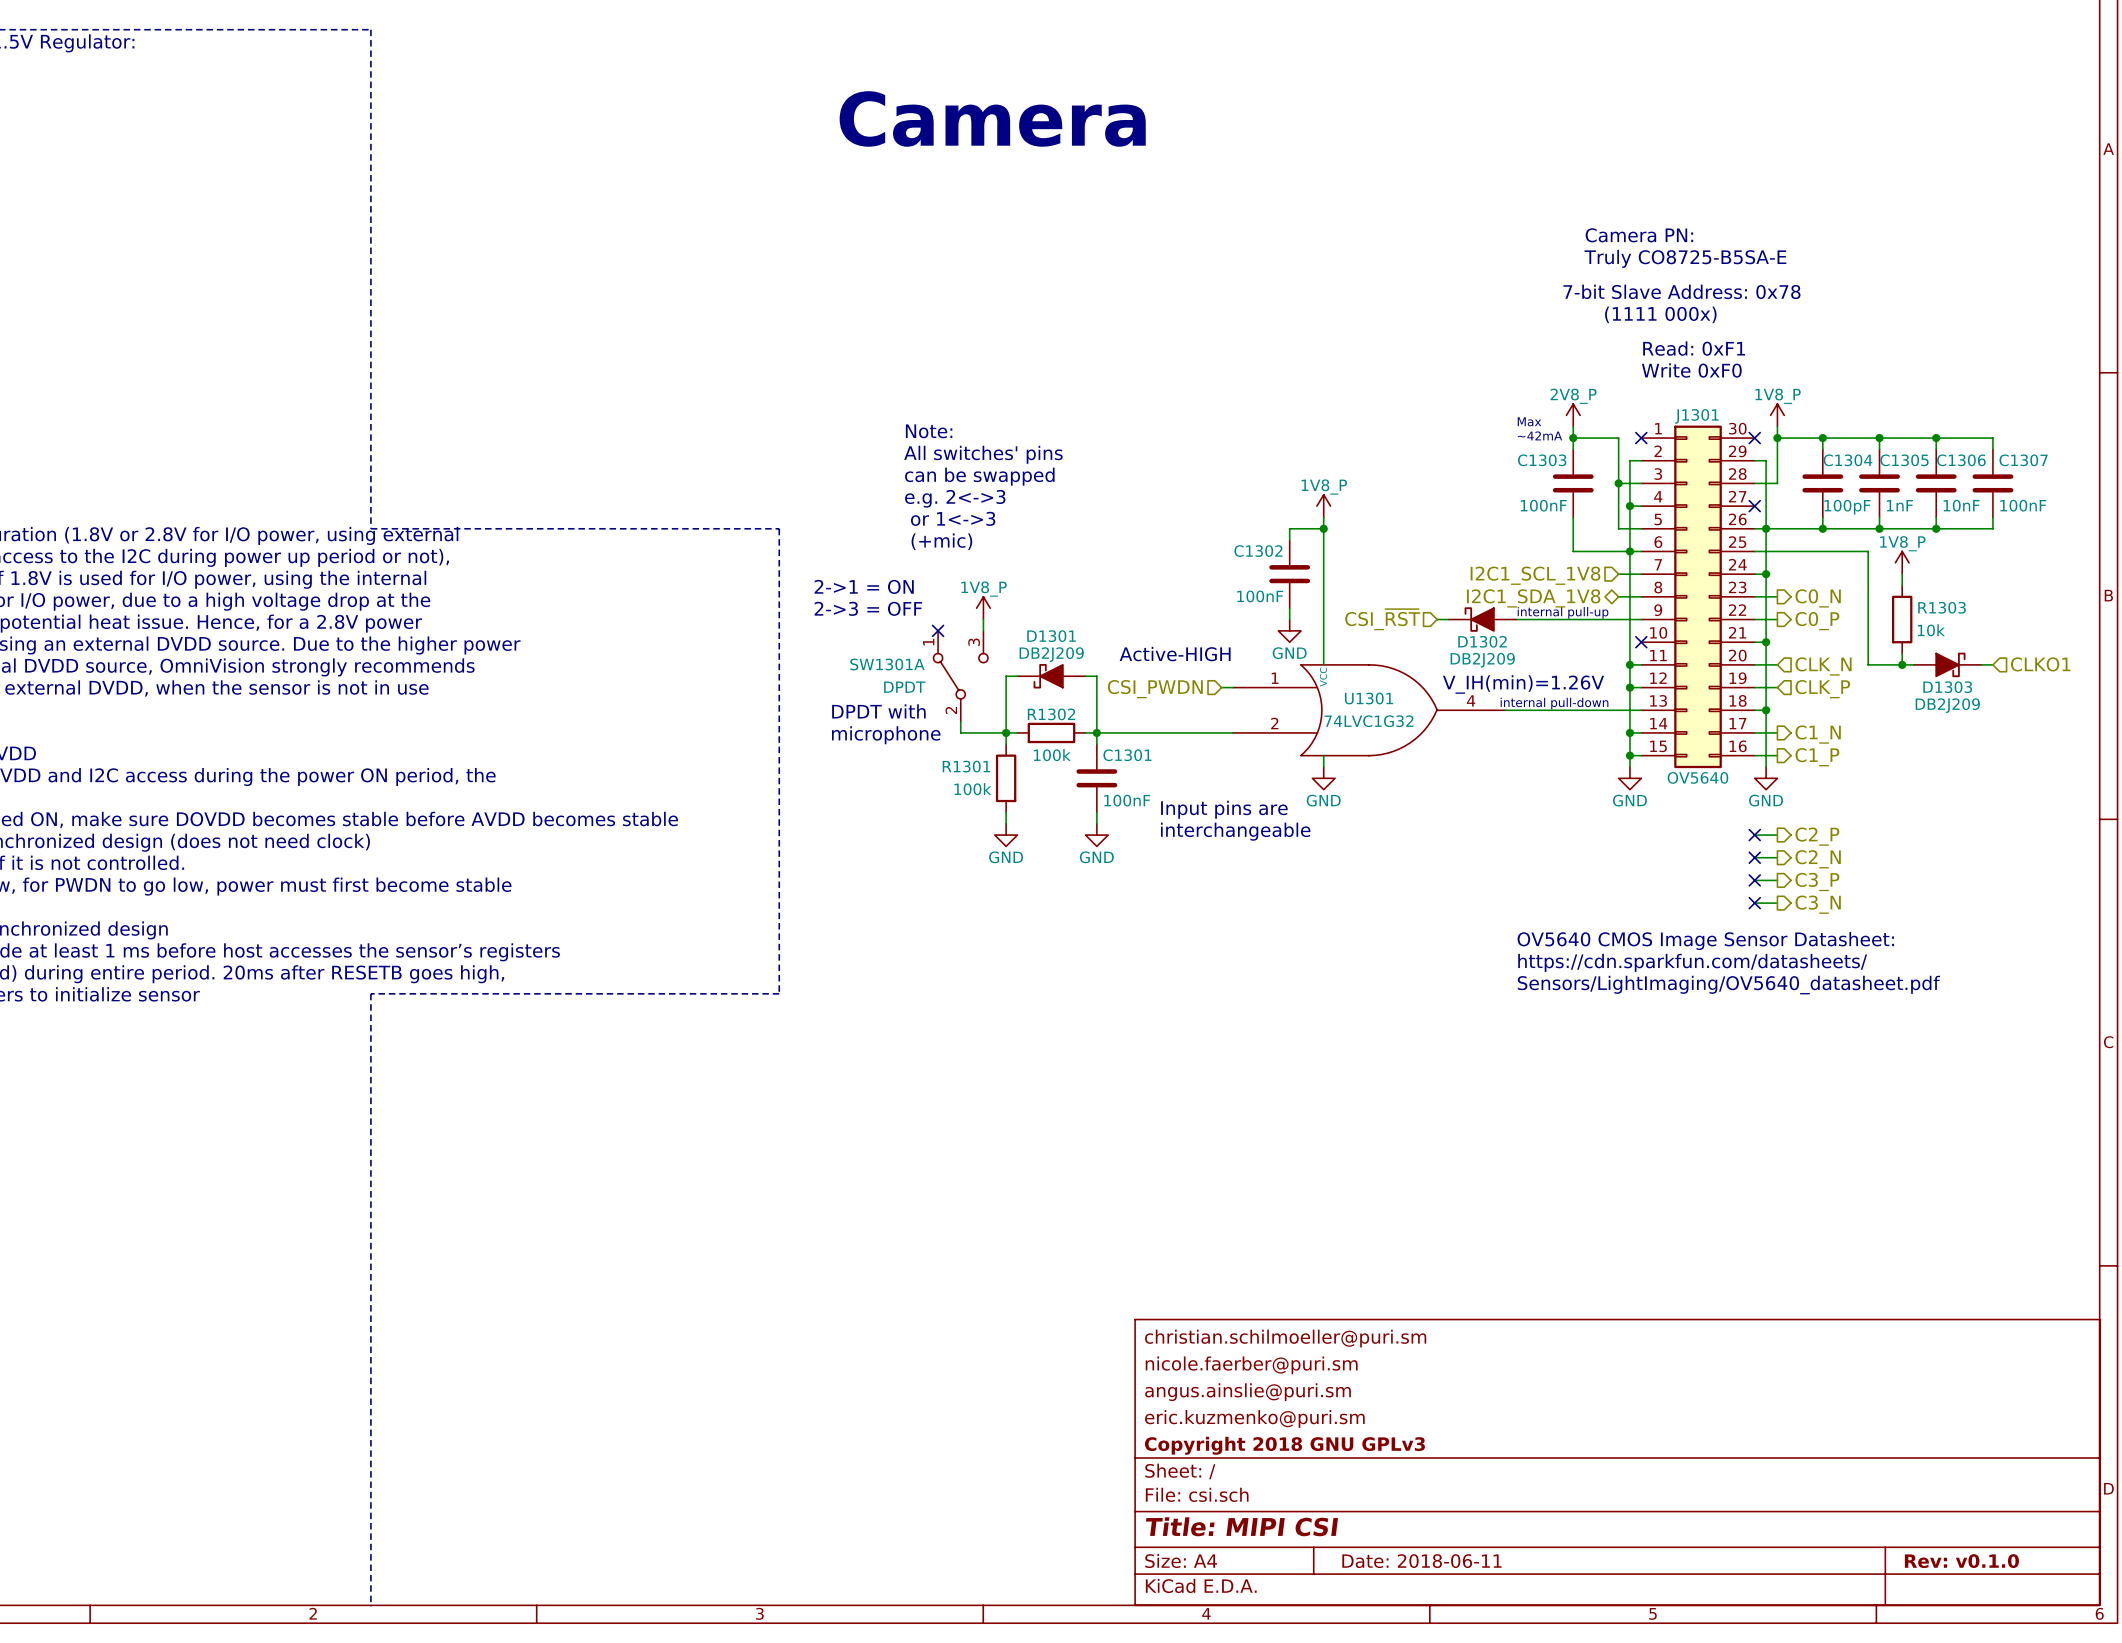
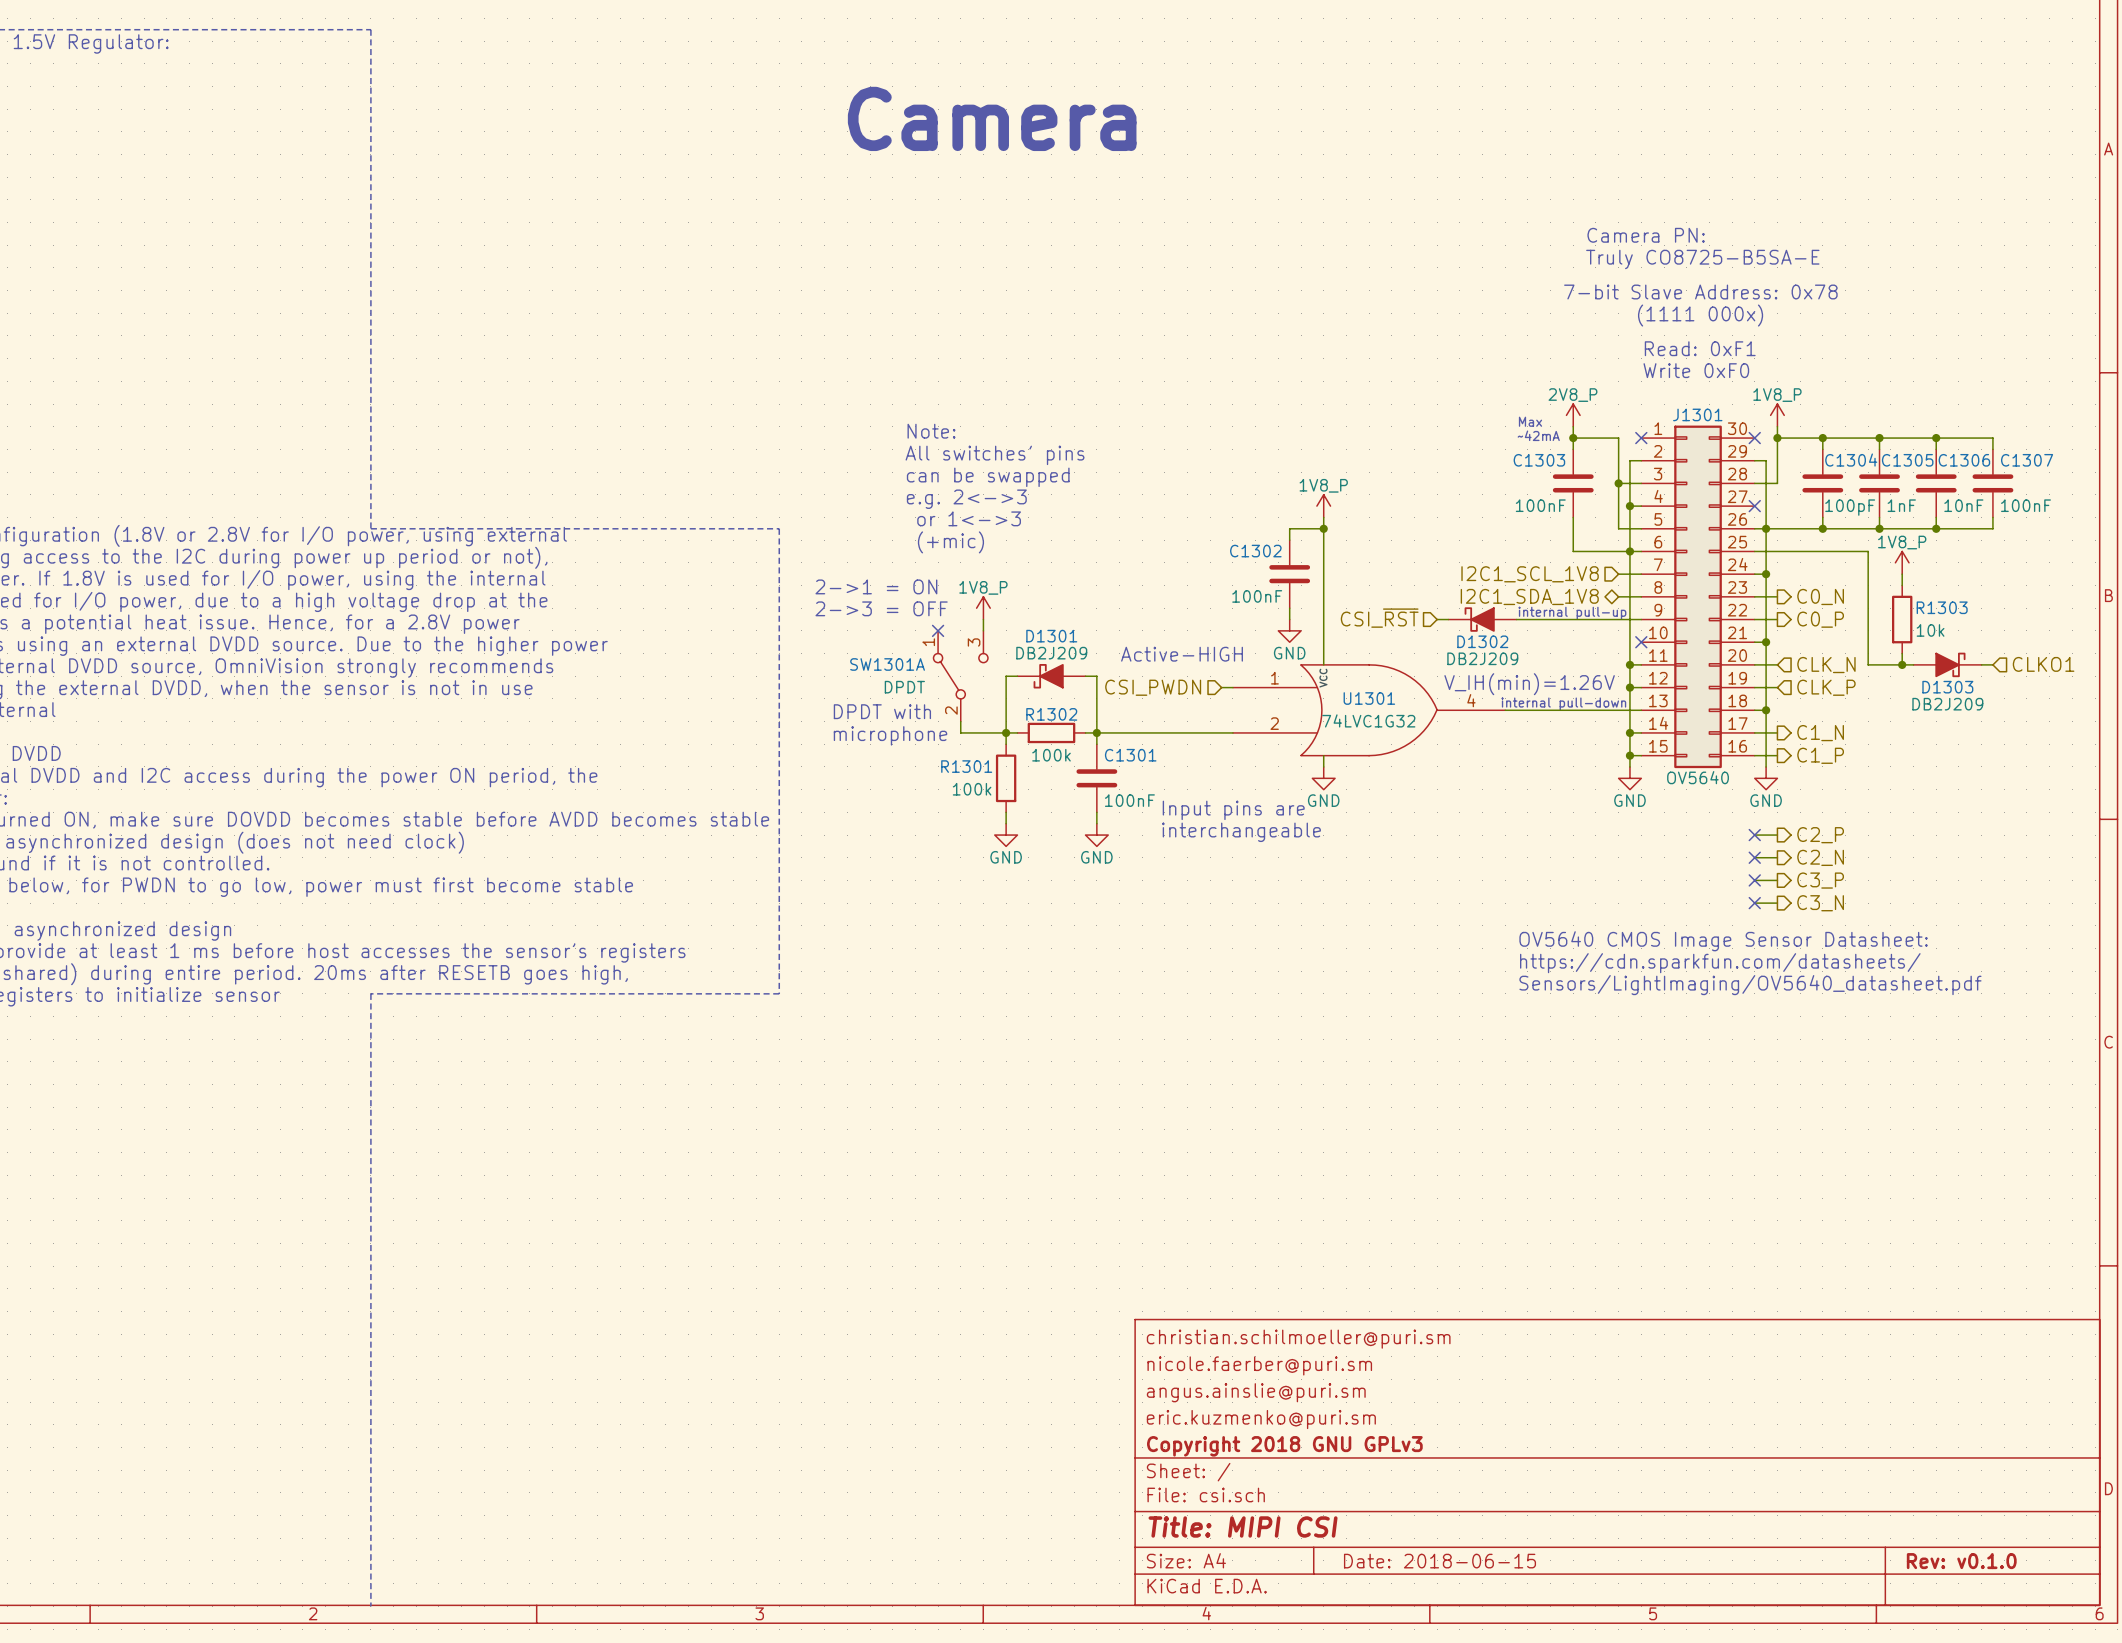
title block: Date: 2018-06-11 (1421, 1561) -> Date: 2018-06-15 (1439, 1561)

